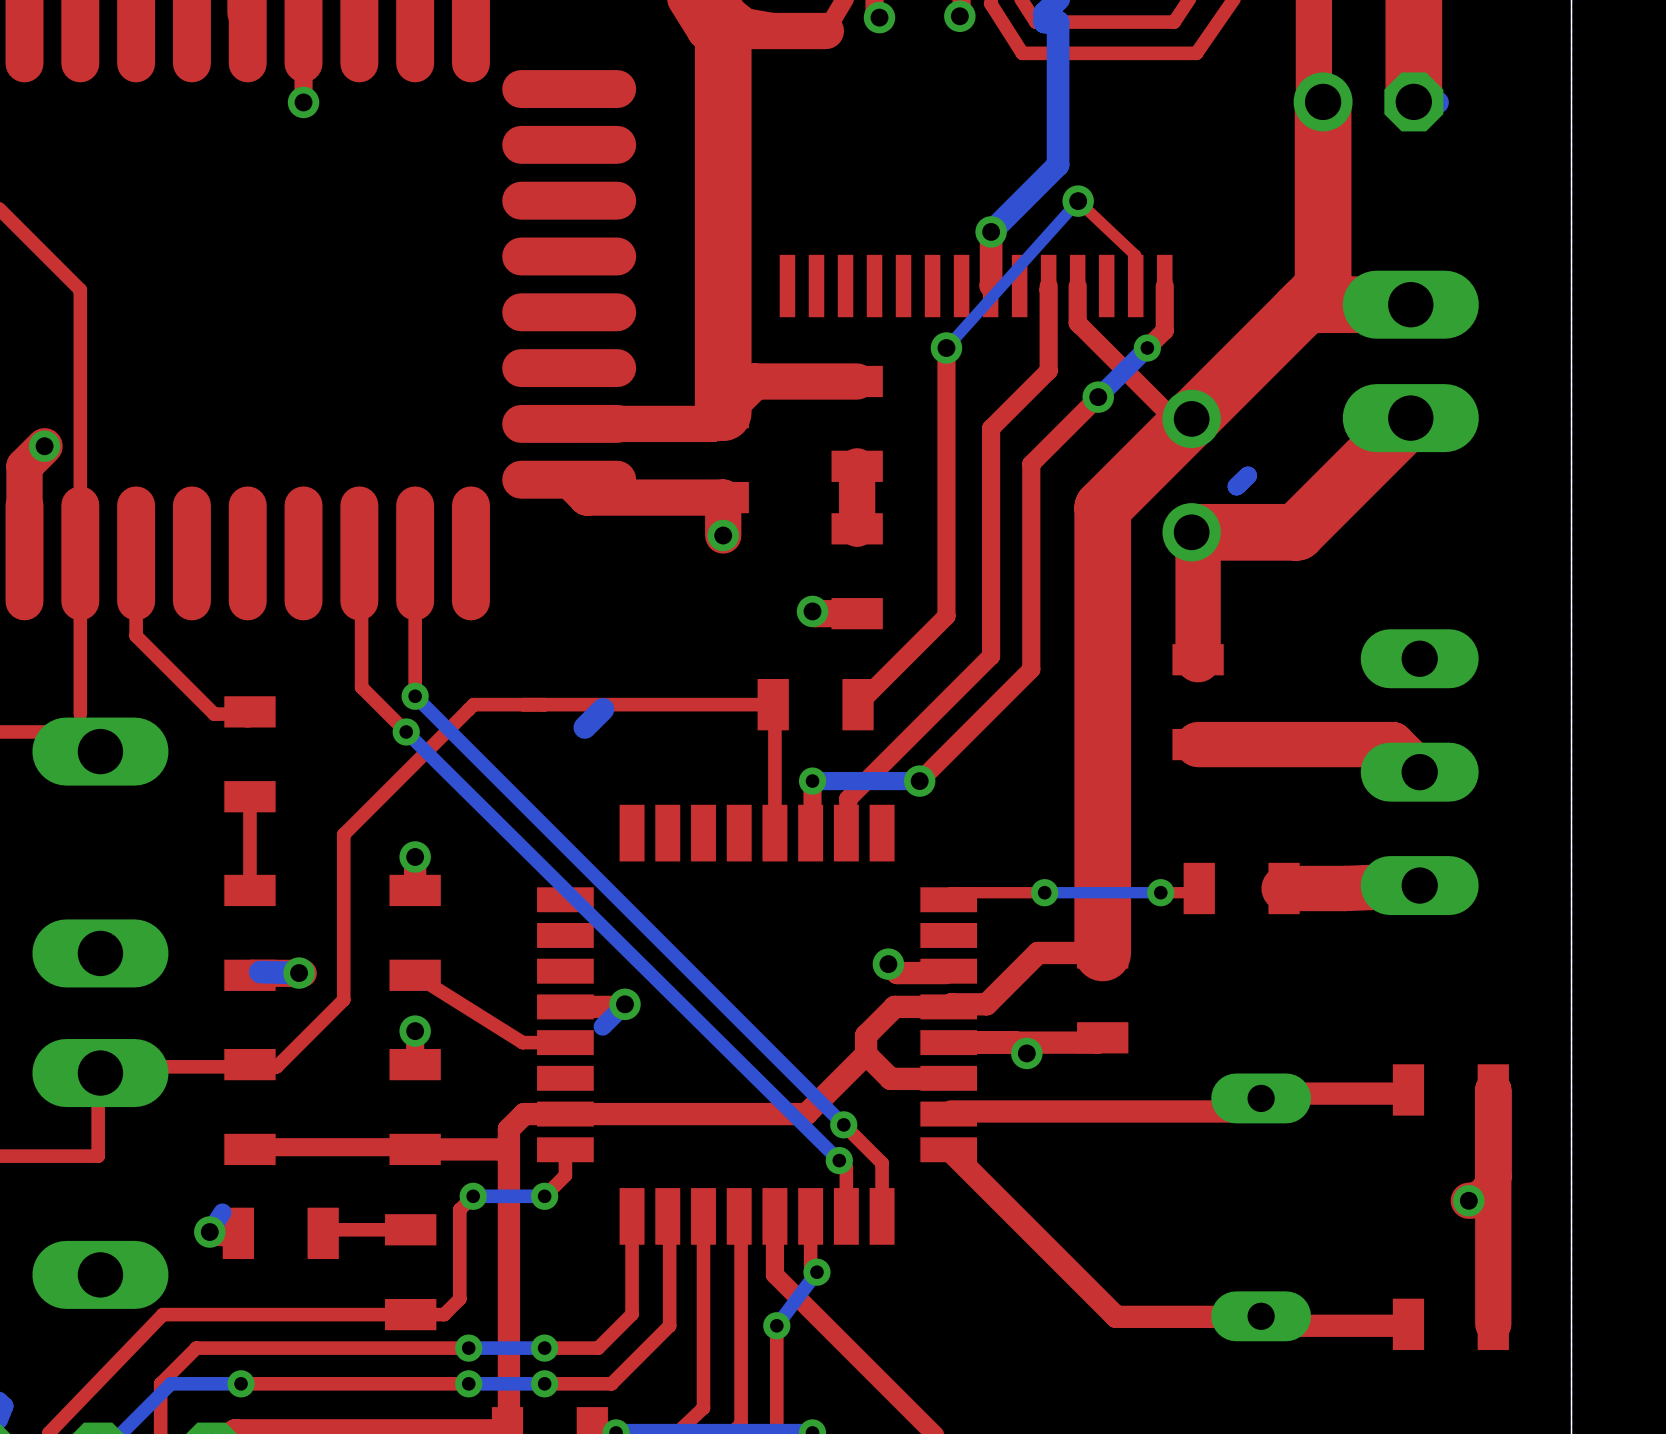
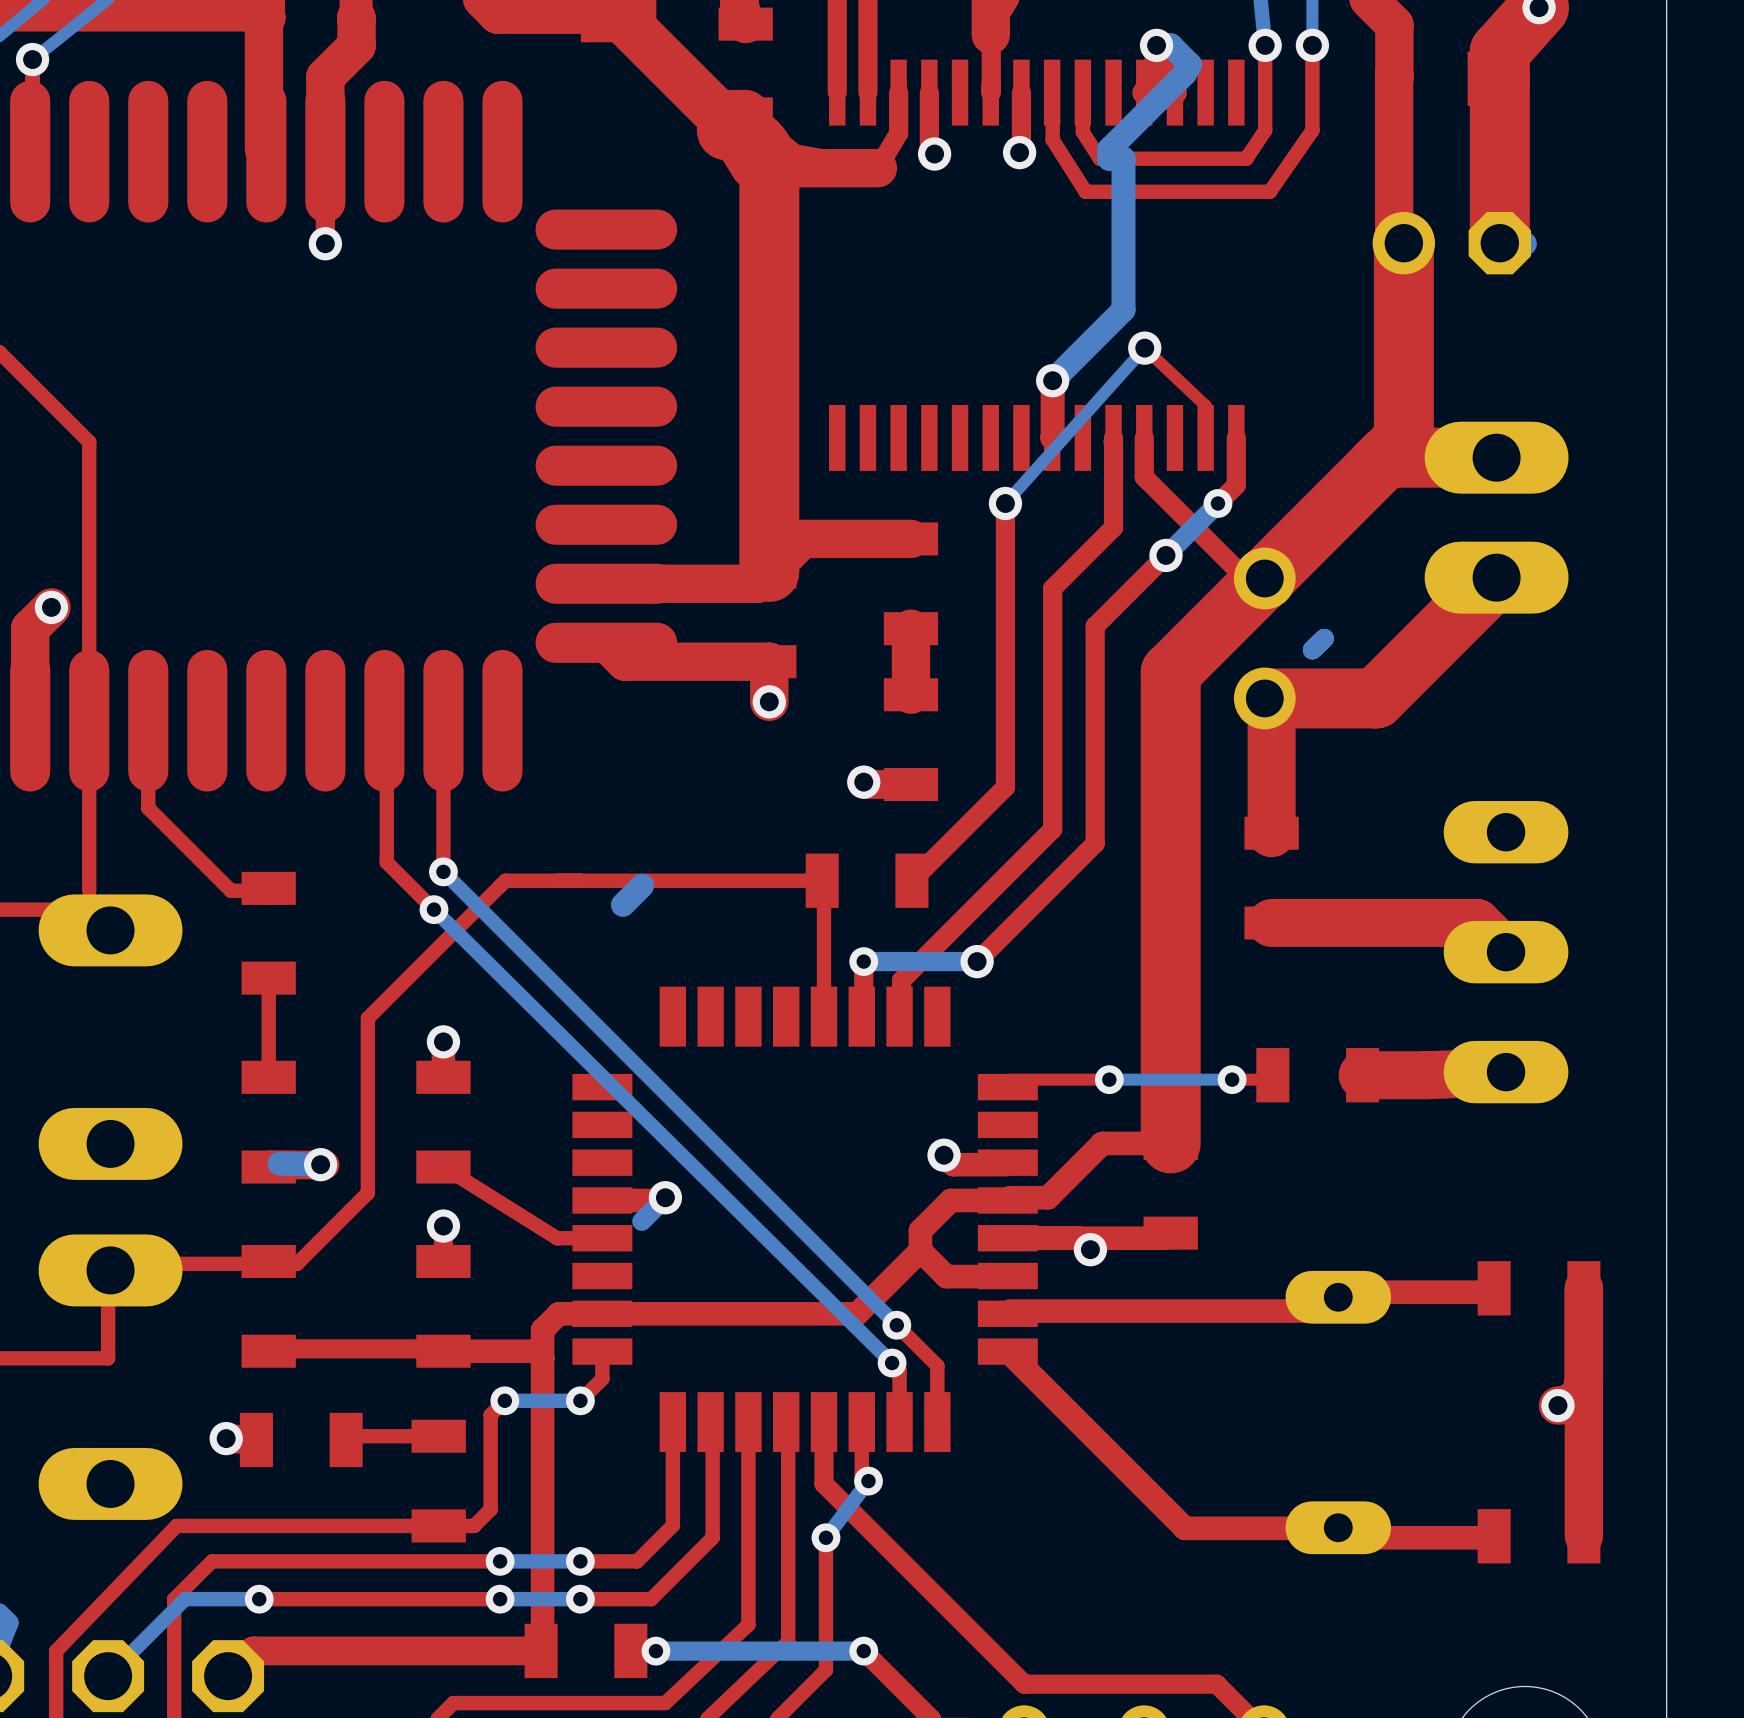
bottom track: (222, 1212) (209, 1232) -> none

